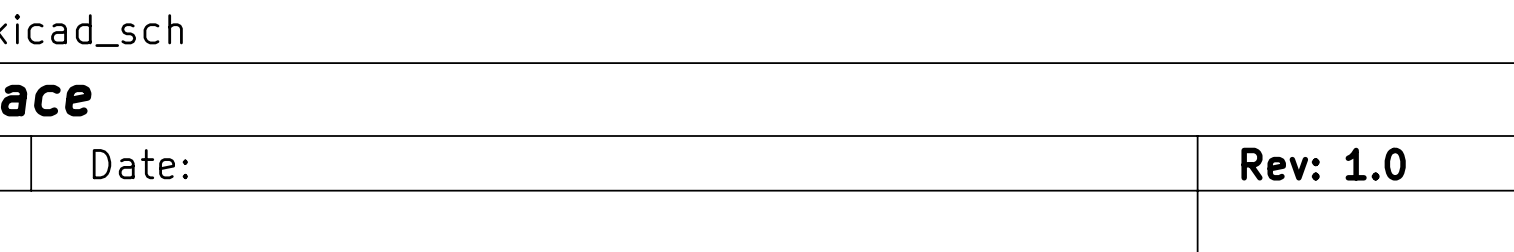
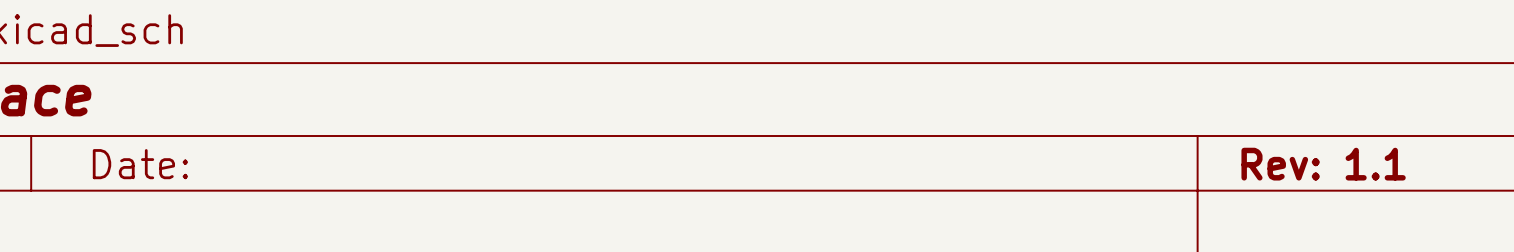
title block: Rev: 1.0 (1323, 164) -> Rev: 1.1 (1323, 164)

